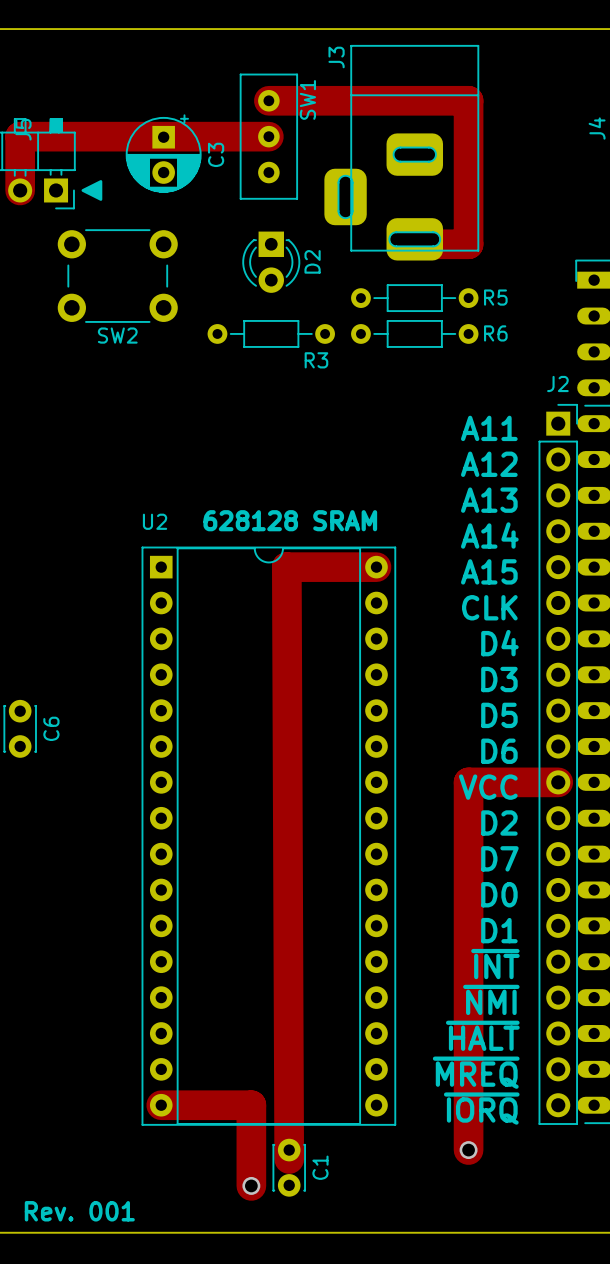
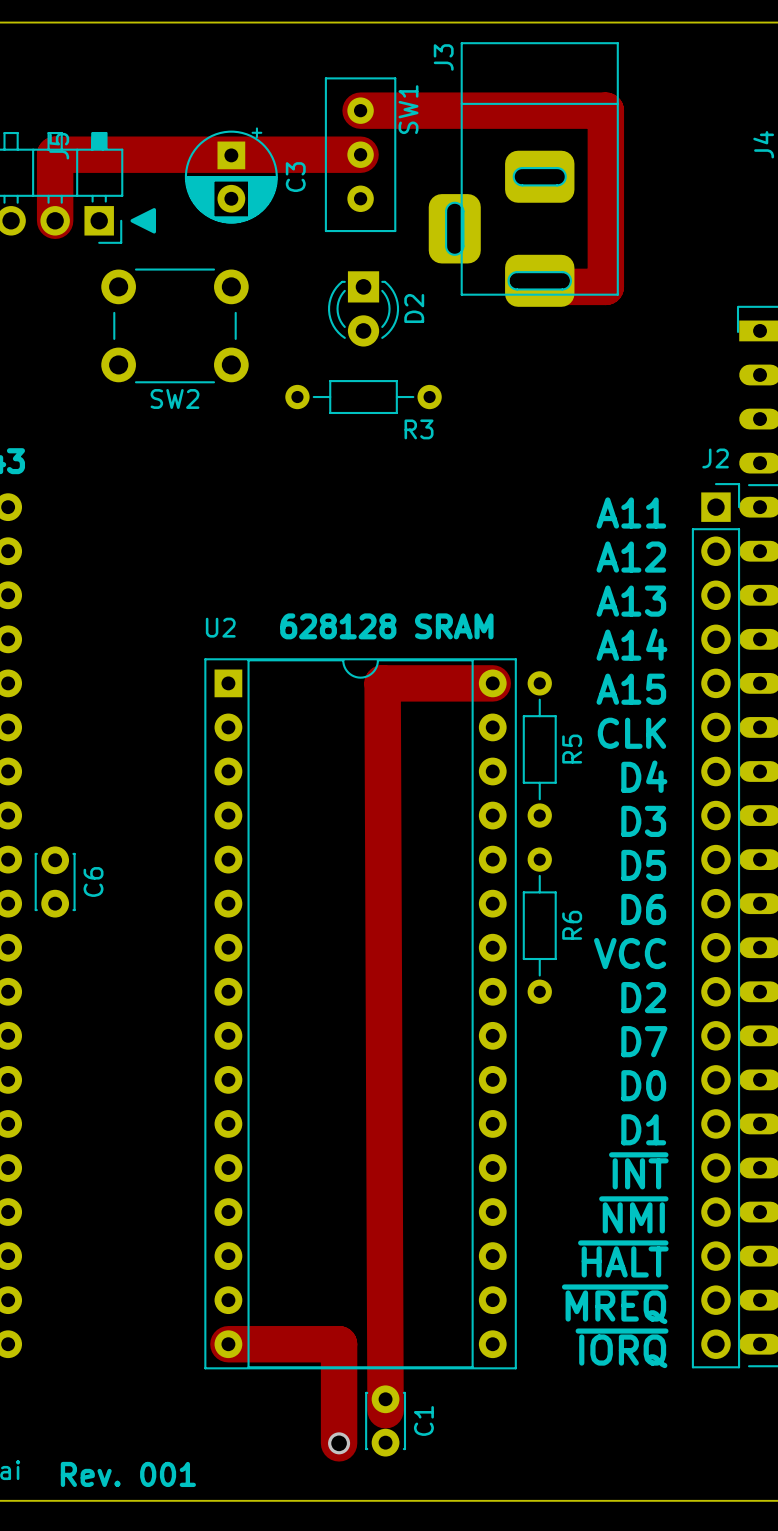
R5 name position: R5 (495, 297) -> R5 (572, 749)
R5 rotation: 0° (414, 298) -> 90° clockwise (539, 749)
R5 position: (414, 298) -> (539, 749)
R6 rotation: 0° (414, 333) -> 90° clockwise (539, 925)
R6 position: (414, 333) -> (539, 925)
R6 name position: R6 (495, 333) -> R6 (572, 925)
track: (558, 782) (468, 782) (468, 1150) -> none
via: (468, 1150) -> none

